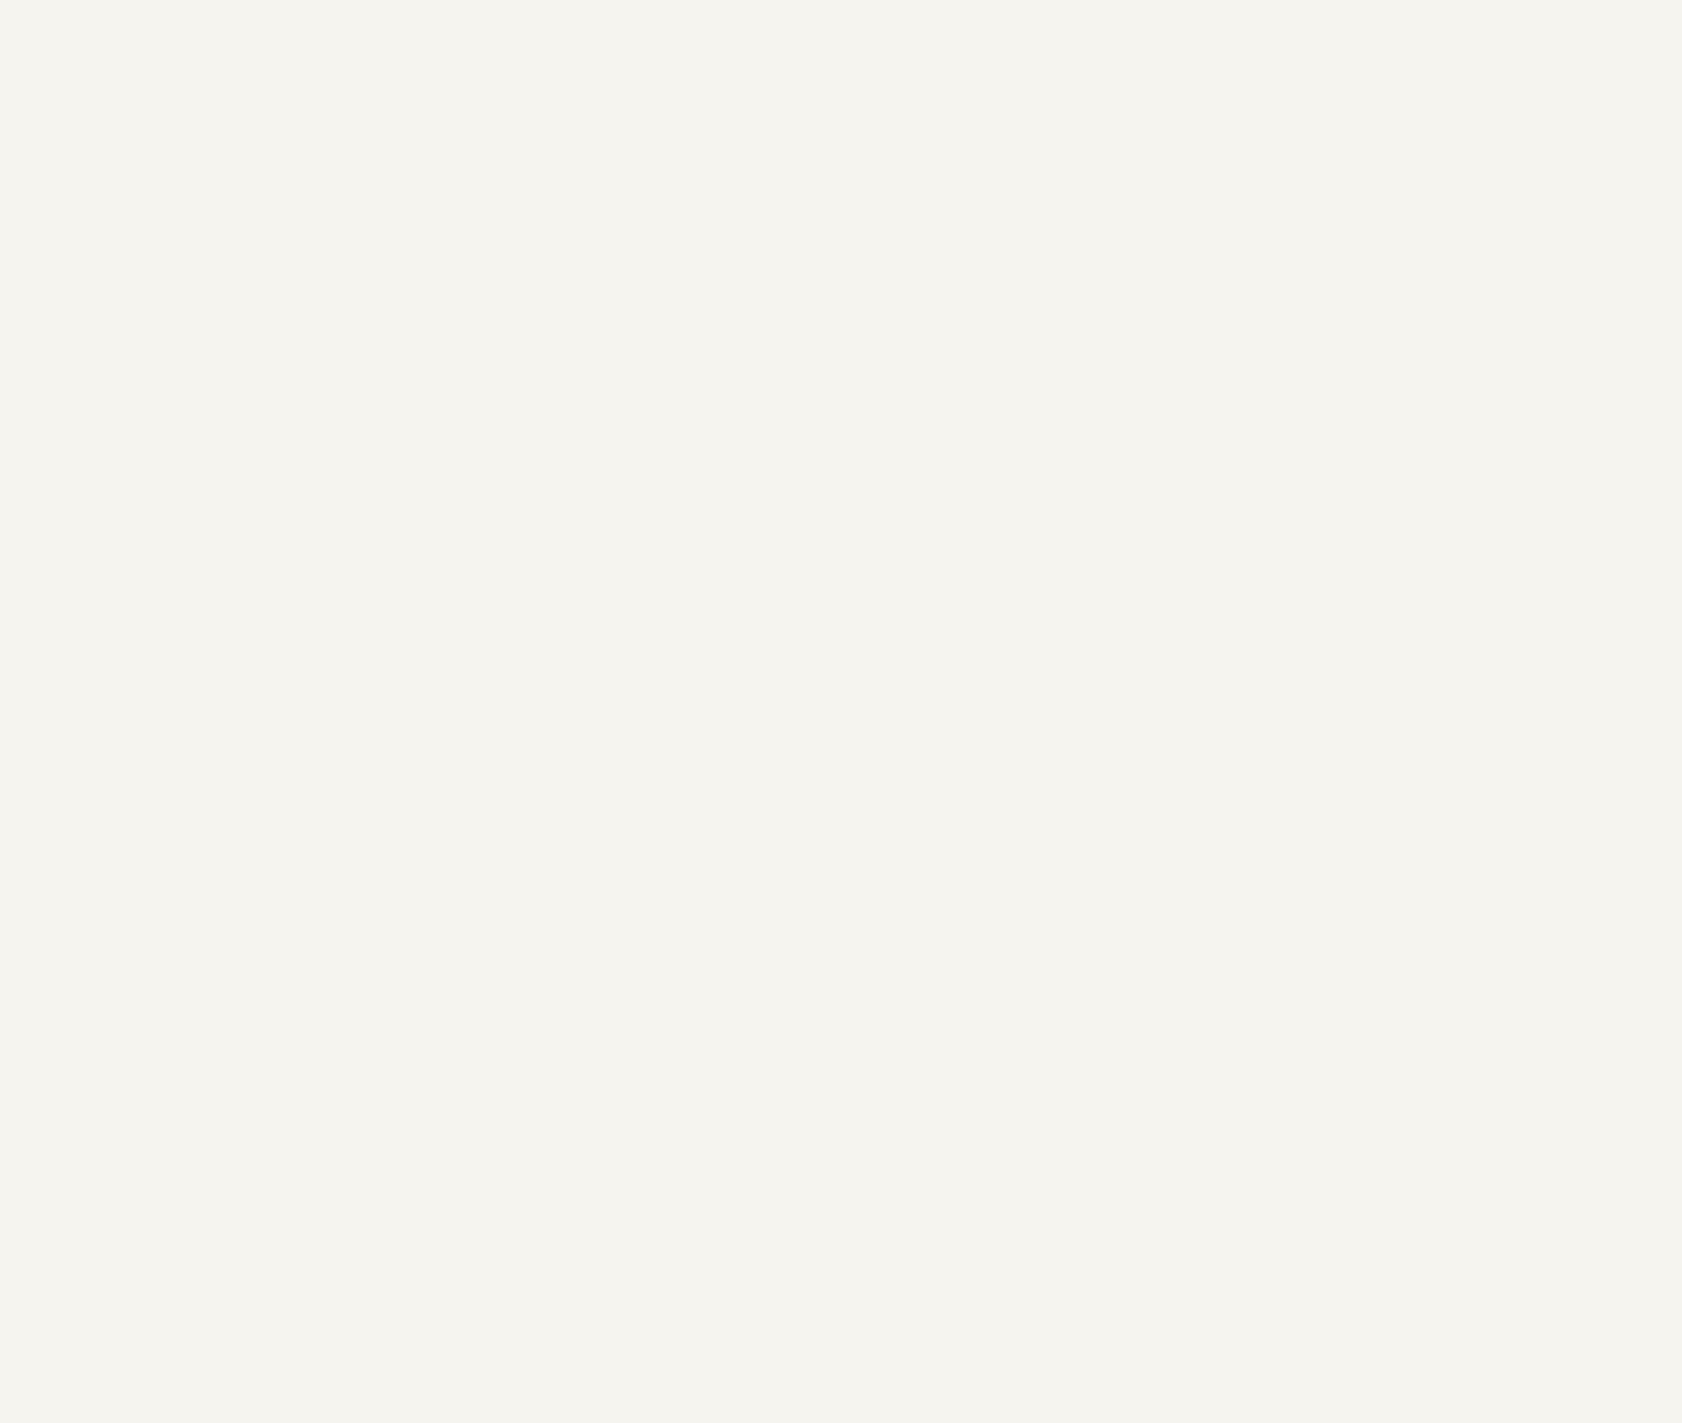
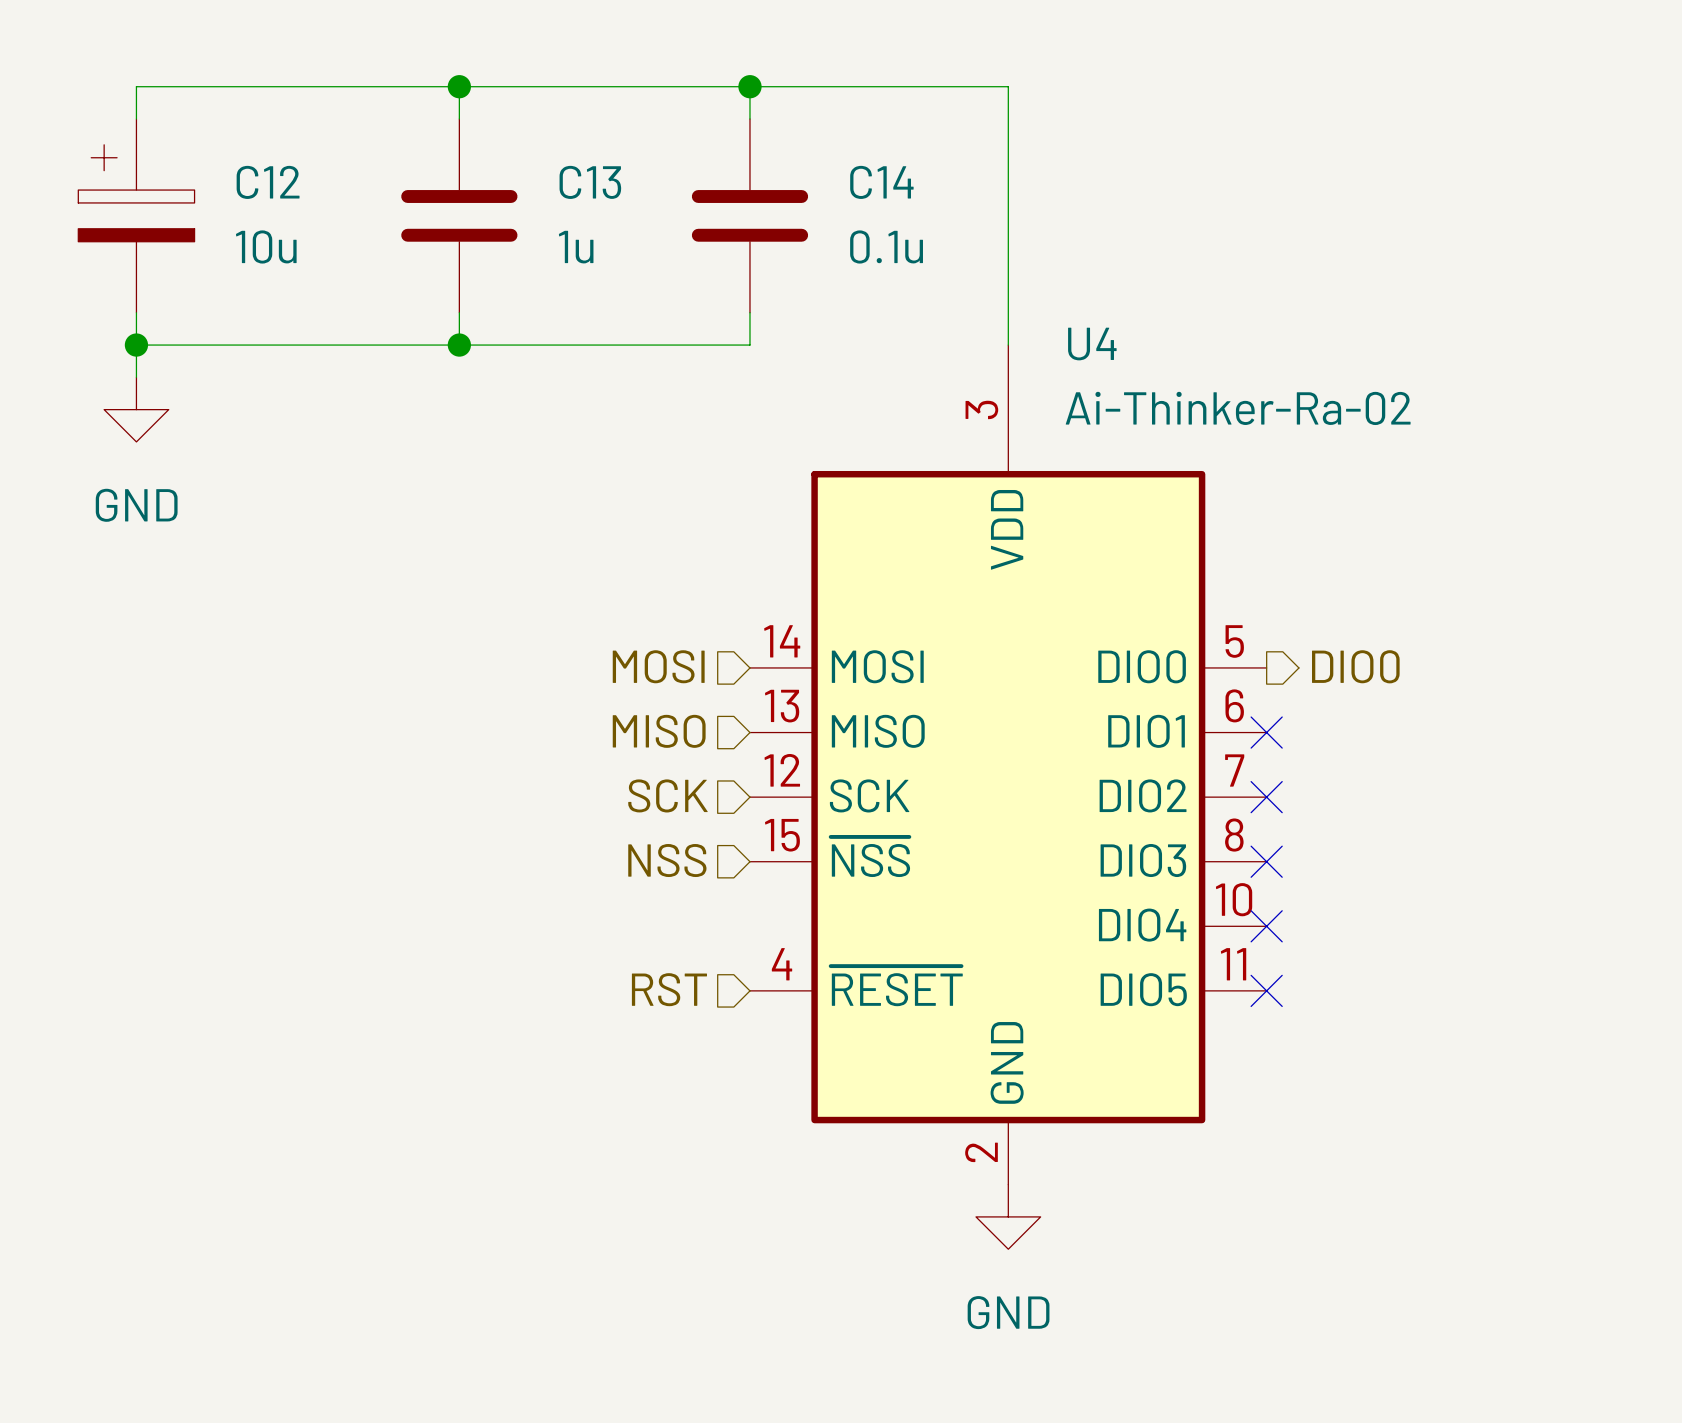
wire: none -> (459, 86) (459, 119)
junction: none -> (459, 86)
wire: none -> (749, 86) (749, 119)
junction: none -> (749, 86)
wire: none -> (136, 119) (136, 86) (1008, 86) (1008, 345)
C12: none -> 10u (136, 215)
C13: none -> 1u (459, 215)
C14: none -> 0.1u (749, 215)
wire: none -> (136, 312) (136, 377)
wire: none -> (459, 312) (459, 345)
wire: none -> (749, 312) (749, 345) (136, 345)
junction: none -> (136, 345)
junction: none -> (459, 345)
power symbol: none -> GND (136, 409)
hierarchical label: none -> MOSI (658, 666)
hierarchical label: none -> DIO0 (1355, 666)
hierarchical label: none -> MISO (659, 731)
no-connect mark: none -> (1266, 732)
U4: none -> Ai-Thinker-Ra-02 (1008, 764)
hierarchical label: none -> SCK (667, 795)
no-connect mark: none -> (1266, 797)
hierarchical label: none -> NSS (667, 860)
no-connect mark: none -> (1266, 861)
no-connect mark: none -> (1266, 926)
hierarchical label: none -> RST (669, 989)
no-connect mark: none -> (1266, 990)
power symbol: none -> GND (1008, 1216)

